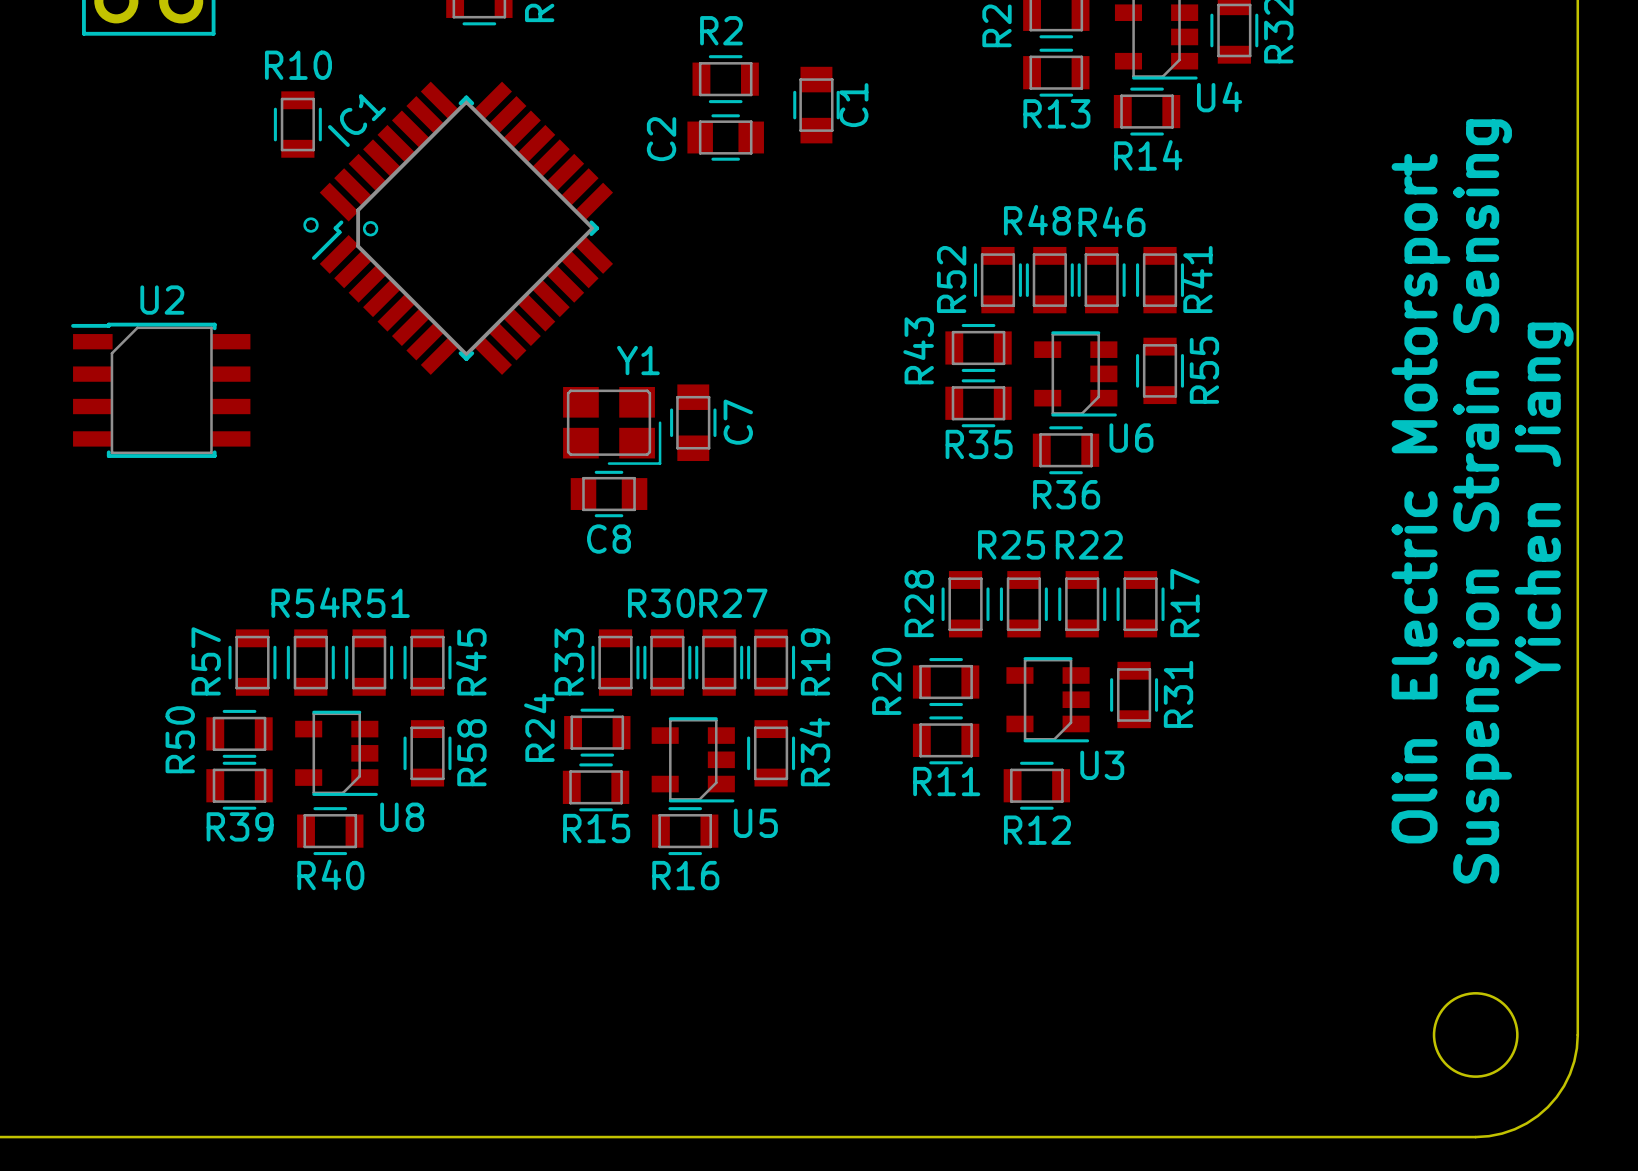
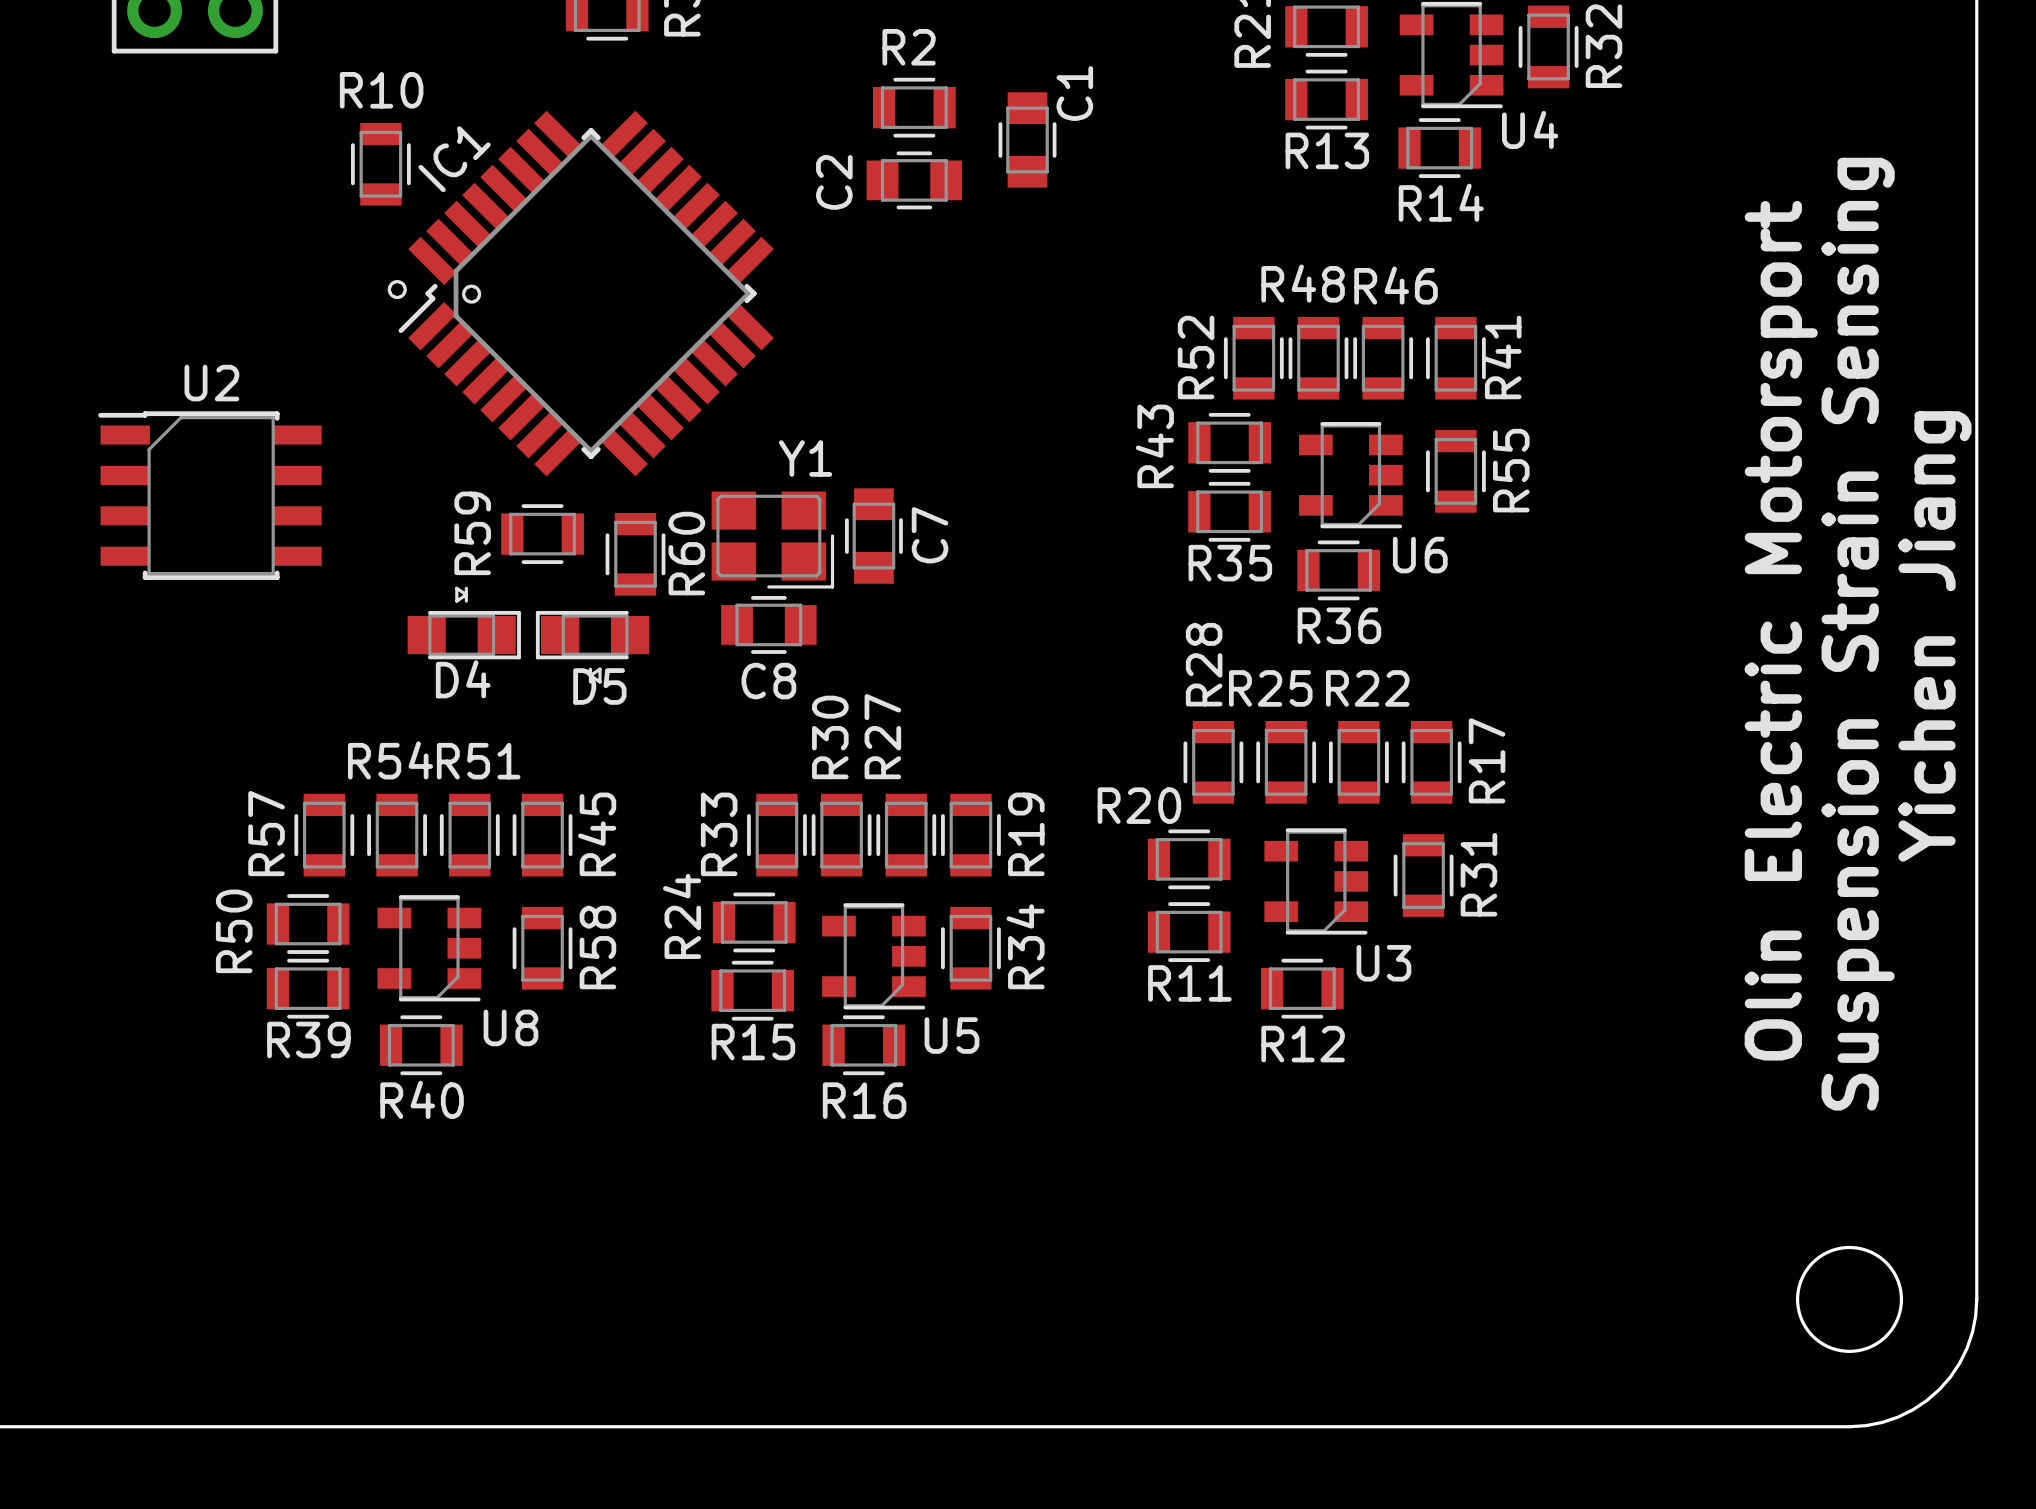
C1 name position: C1 (853, 105) -> C1 (1074, 93)
R59: none -> (542, 534)
R60: none -> (635, 554)
D4: none -> (464, 623)
D5: none -> (592, 647)
R30 name rotation: 0° (661, 603) -> 90° counterclockwise (830, 737)
R27 name rotation: 0° (733, 603) -> 90° counterclockwise (882, 736)
R28 name position: R28 (919, 603) -> R28 (1204, 664)
R20 name rotation: 0° (886, 681) -> 90° clockwise (1139, 805)

